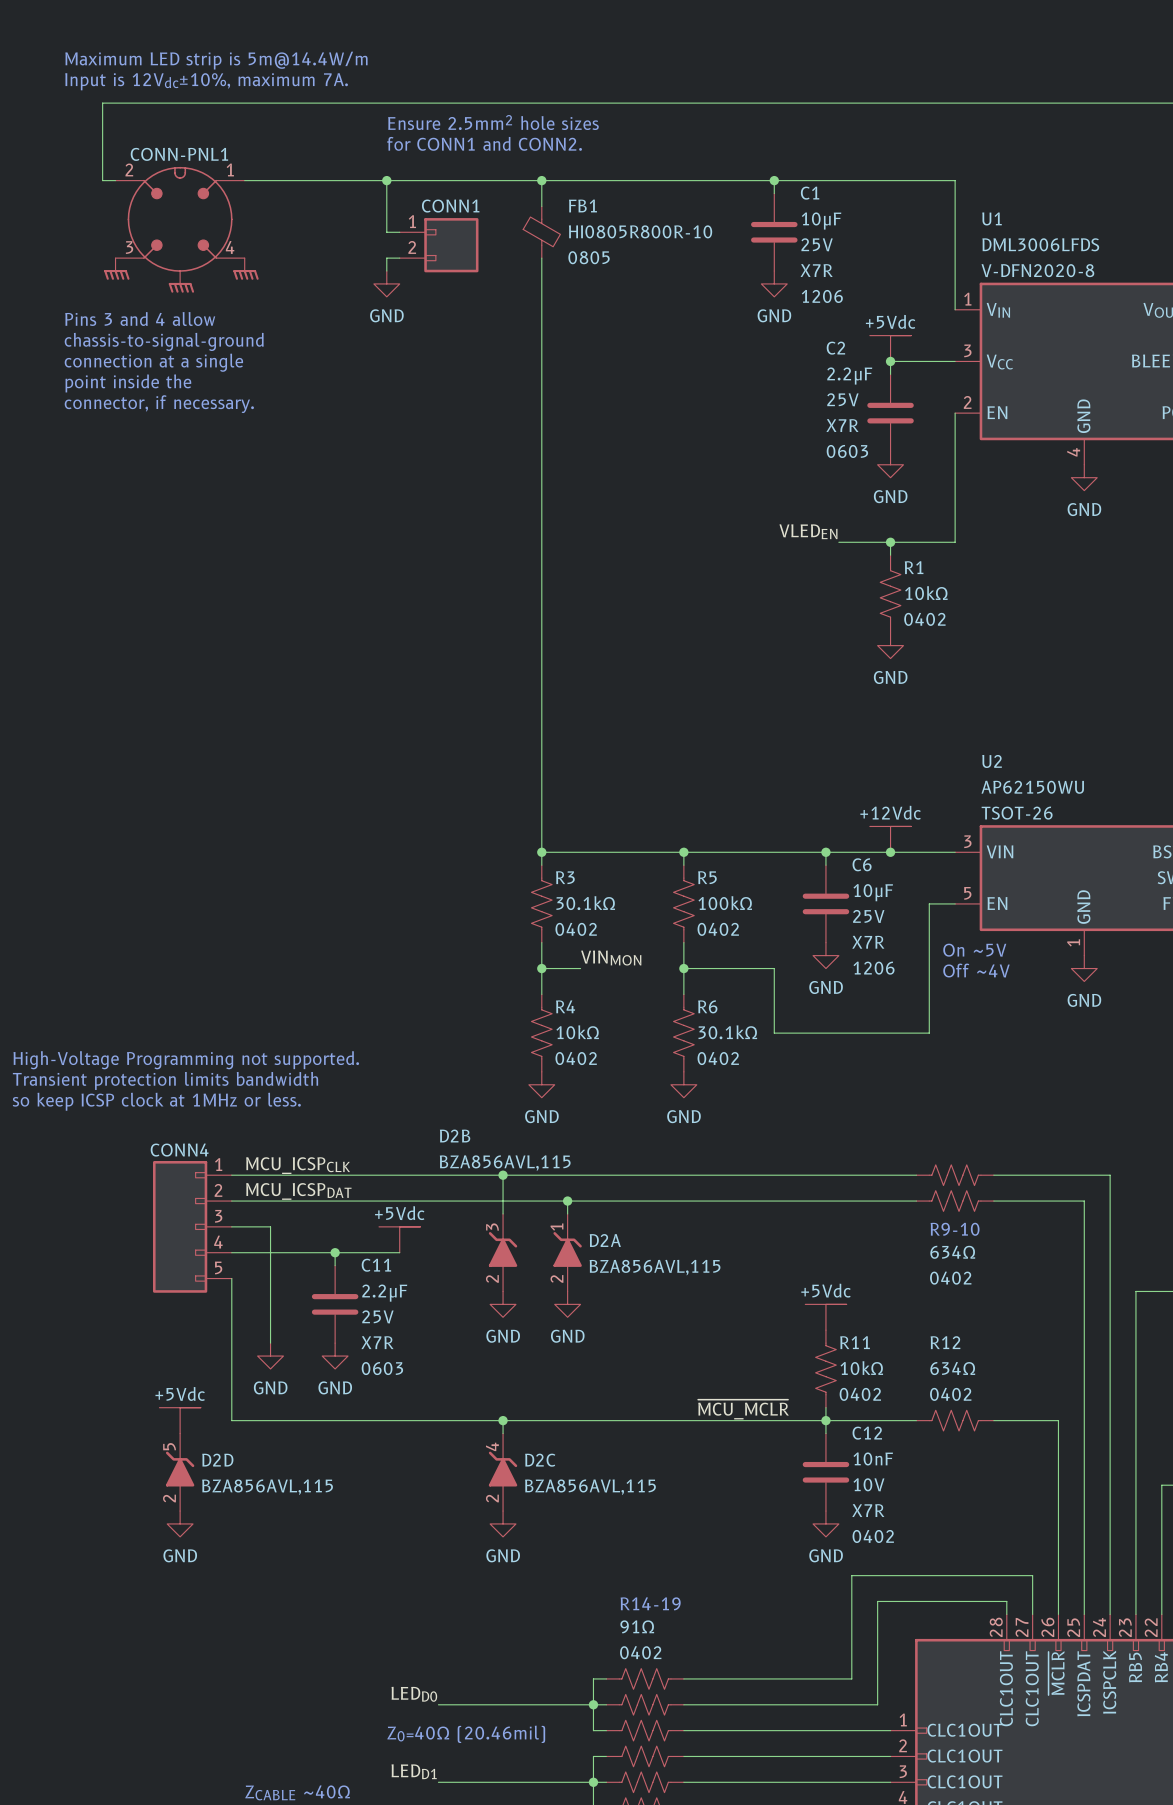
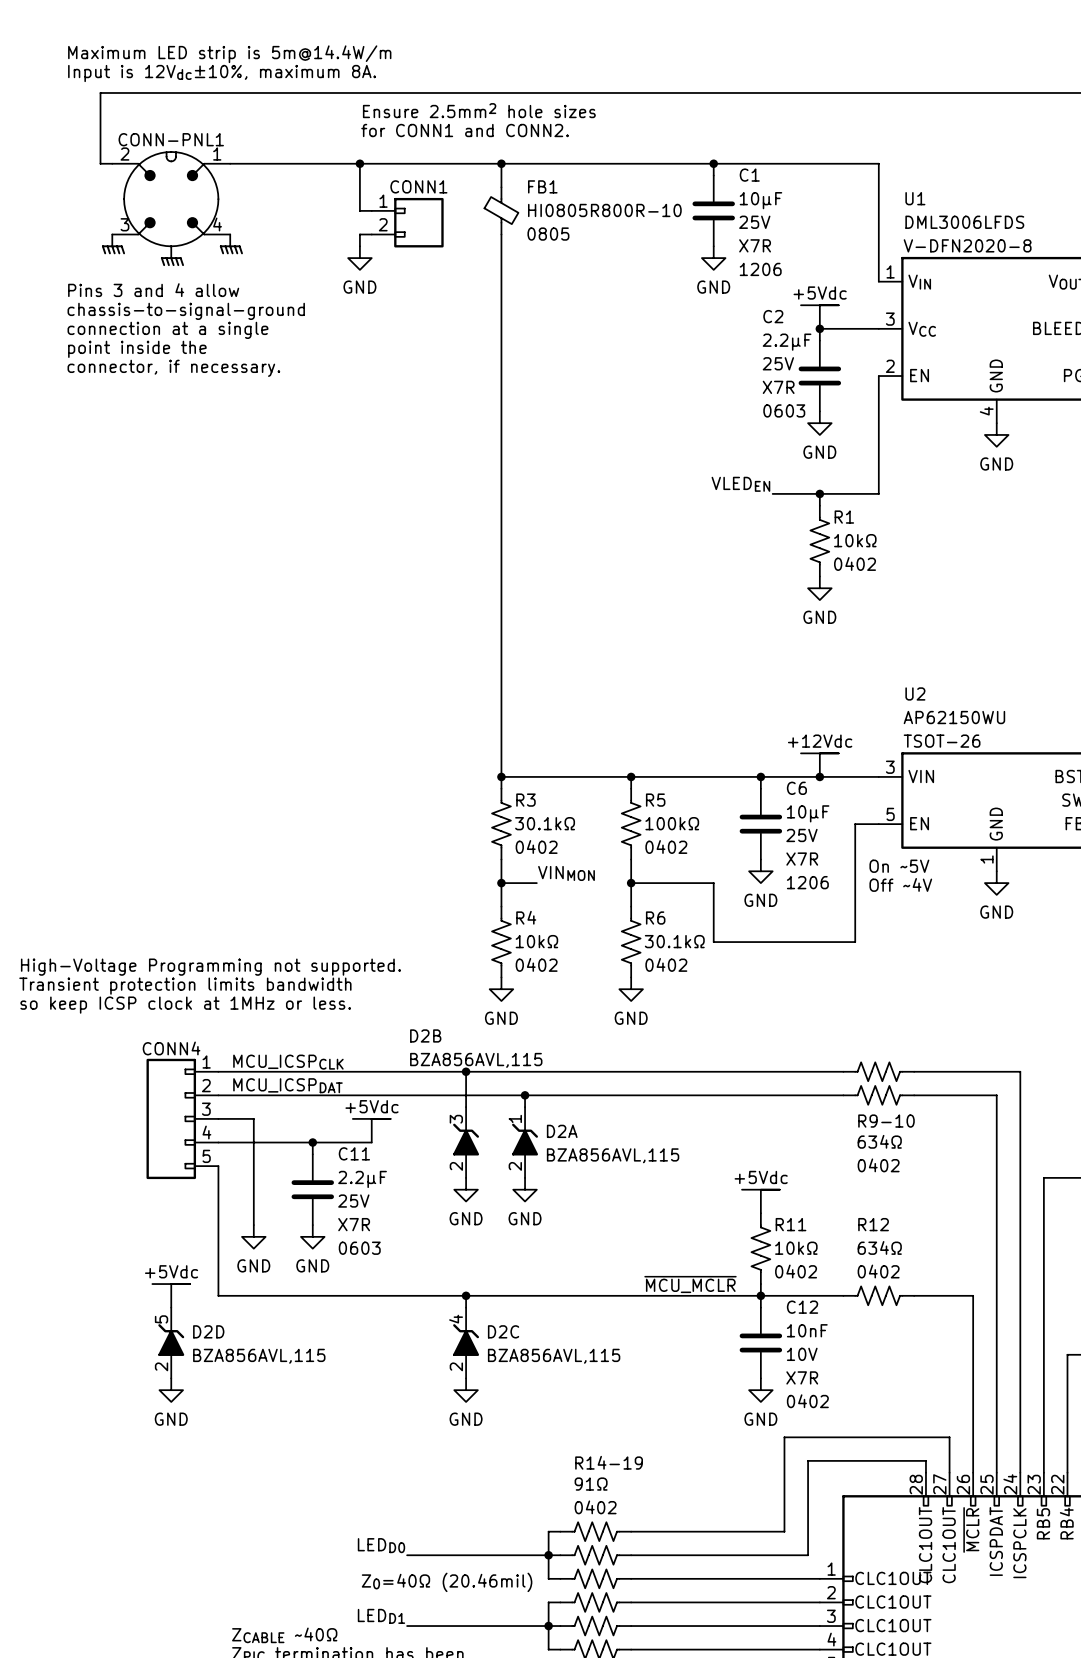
text: Input is 12Vdc±10%, maximum 7A. (206, 81) -> Input is 12Vdc±10%, maximum 8A. (222, 73)

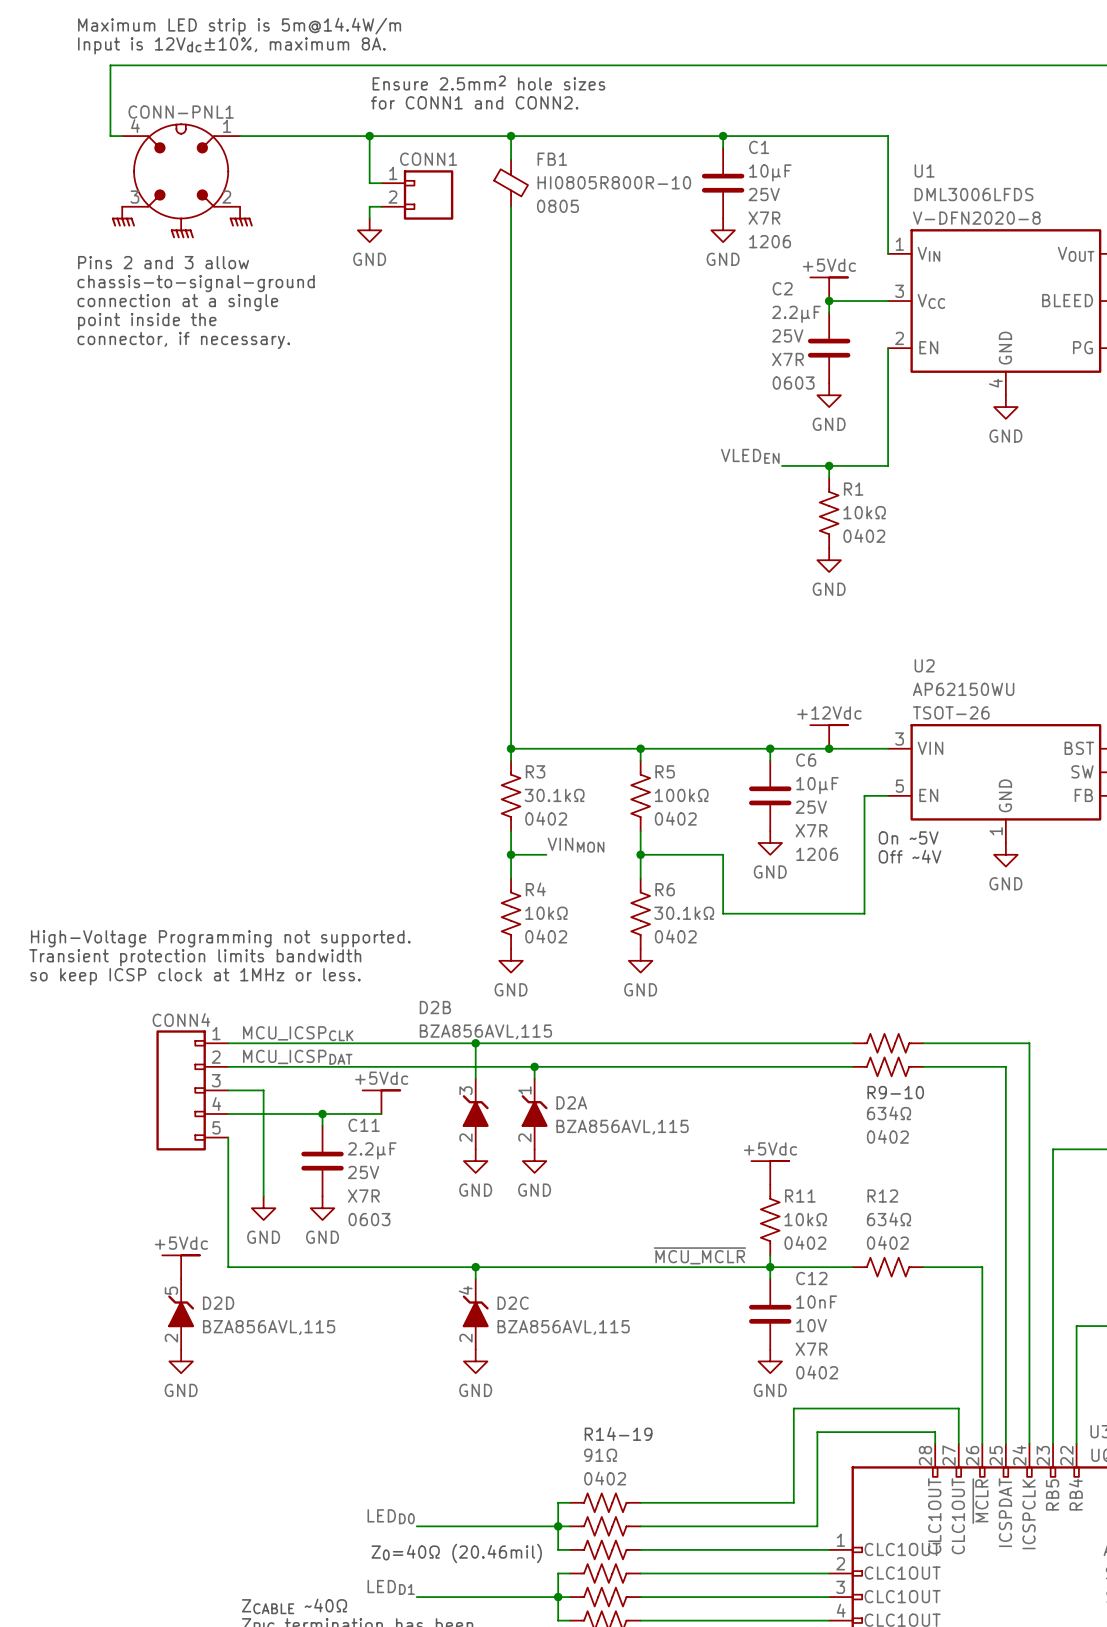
CONN-PNL1 pin number: 2 (124, 154) -> 4 (135, 126)
CONN-PNL1 pin number: 4 (217, 224) -> 2 (226, 197)
text: Pins 3 and 4 allow (153, 290) -> Pins 2 and 3 allow (163, 262)

